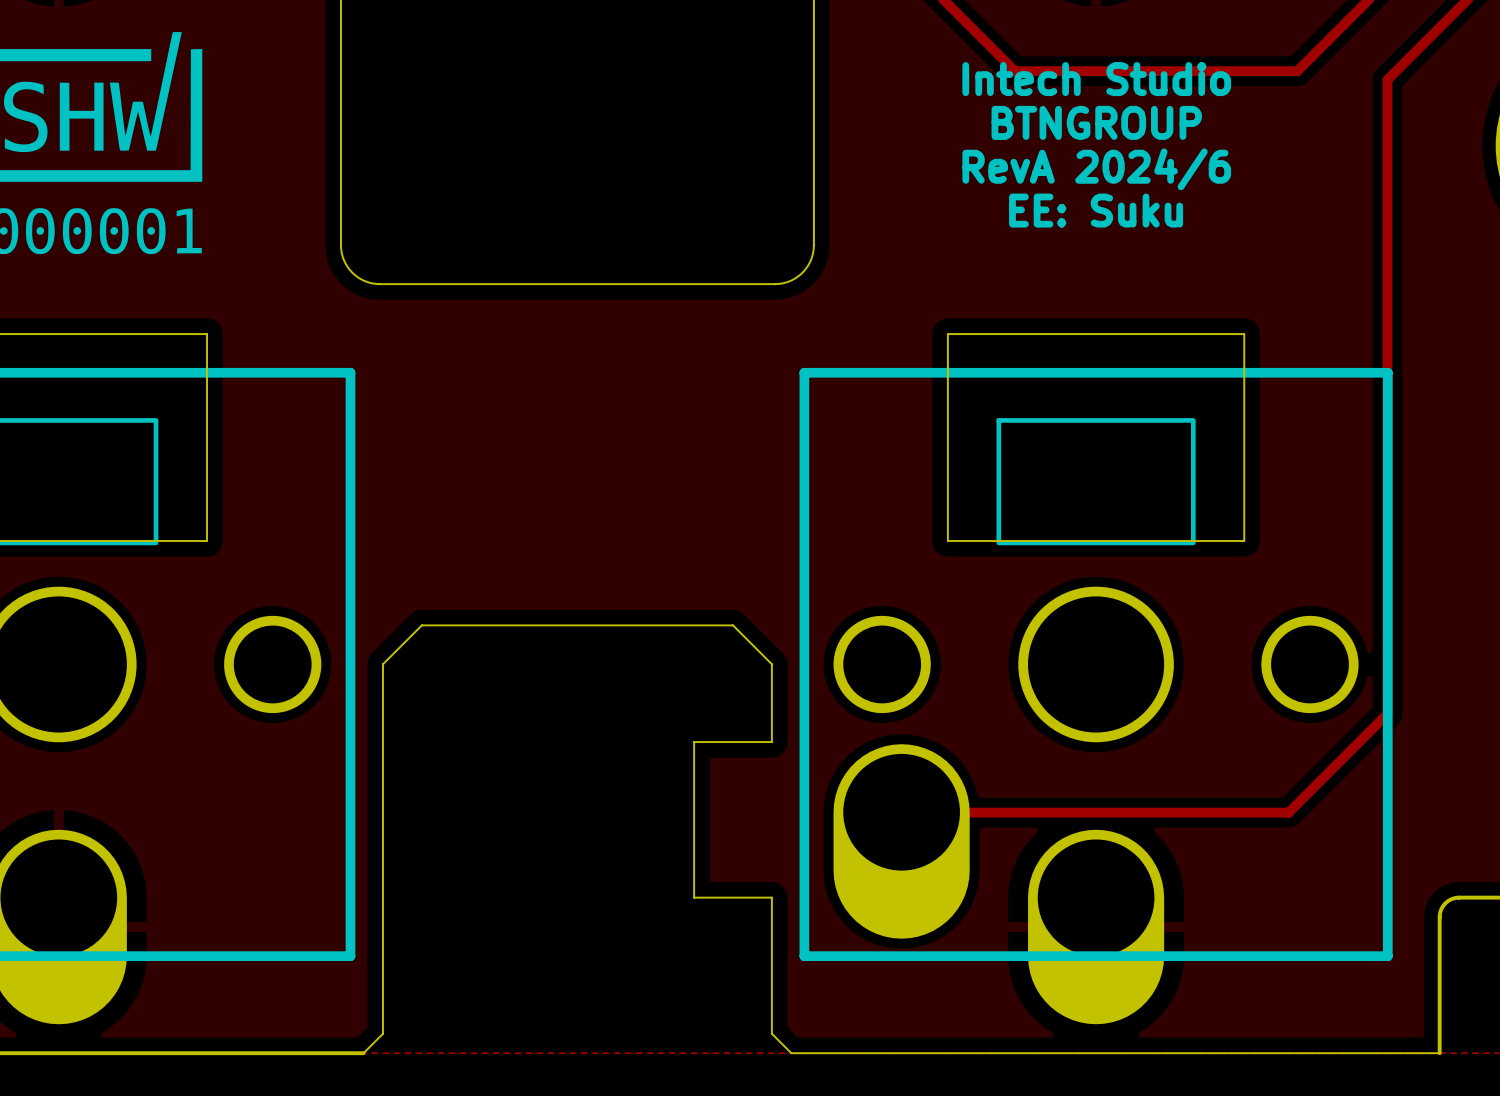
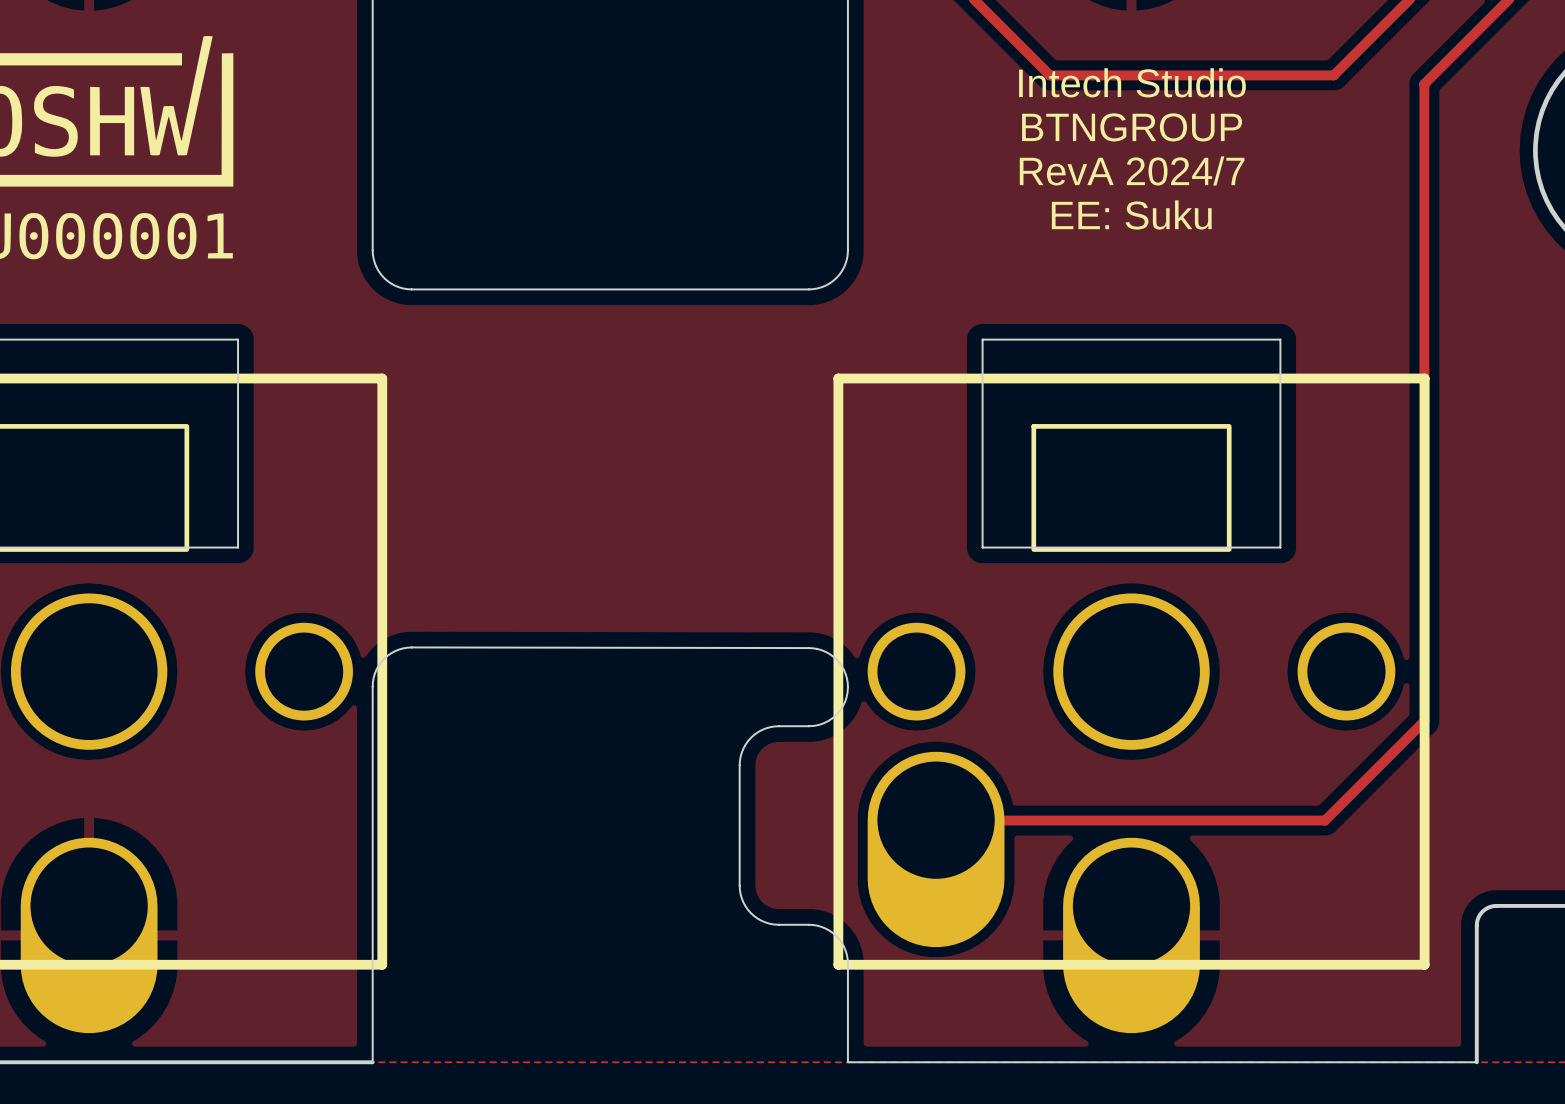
text: RevA 2024/6 (1096, 169) -> RevA 2024/7 (1132, 170)
board edge: (340, 1053) (363, 1053) (382, 1033) (382, 664) (421, 625) (733, 625) (771, 664) (771, 742) (694, 742) (694, 897) (771, 897) (771, 1033) (791, 1053) (813, 1053) -> (372, 1062) (372, 682) (376, 669) (384, 658) (394, 651) (411, 647) (808, 648) (825, 651) (836, 659) (845, 674) (847, 687) (844, 702) (836, 714) (828, 720) (813, 725) (778, 726) (765, 728) (754, 734) (743, 748) (739, 765) (739, 885) (745, 906) (757, 918) (774, 924) (808, 924) (821, 926) (833, 933) (841, 943) (847, 963) (847, 1062)

